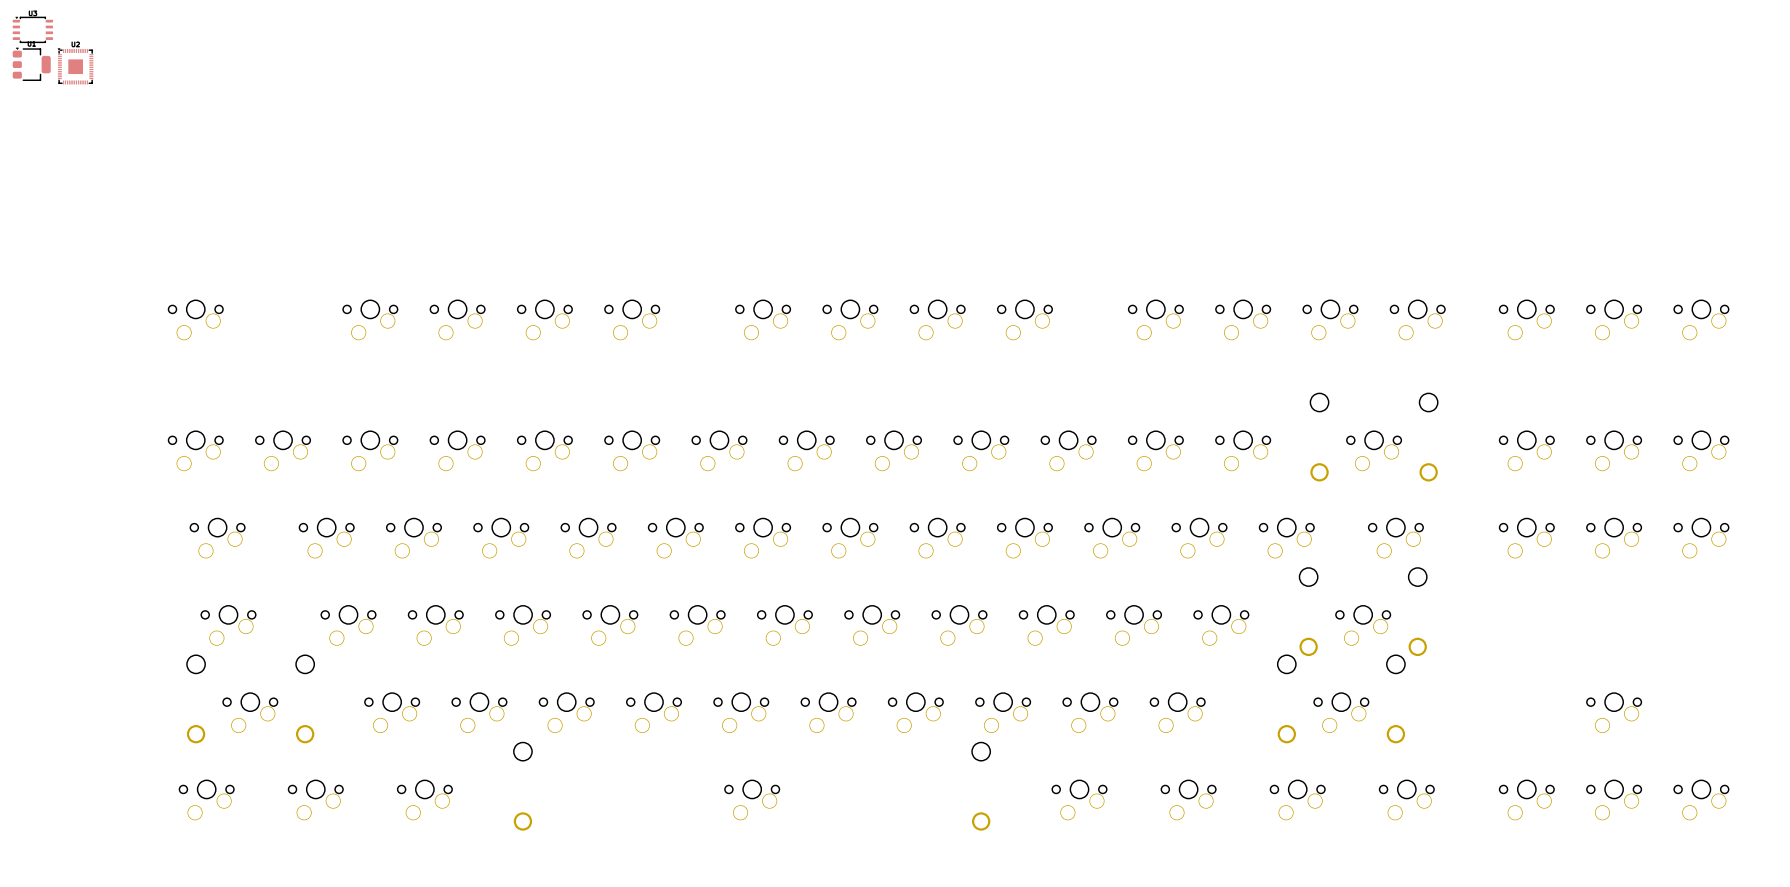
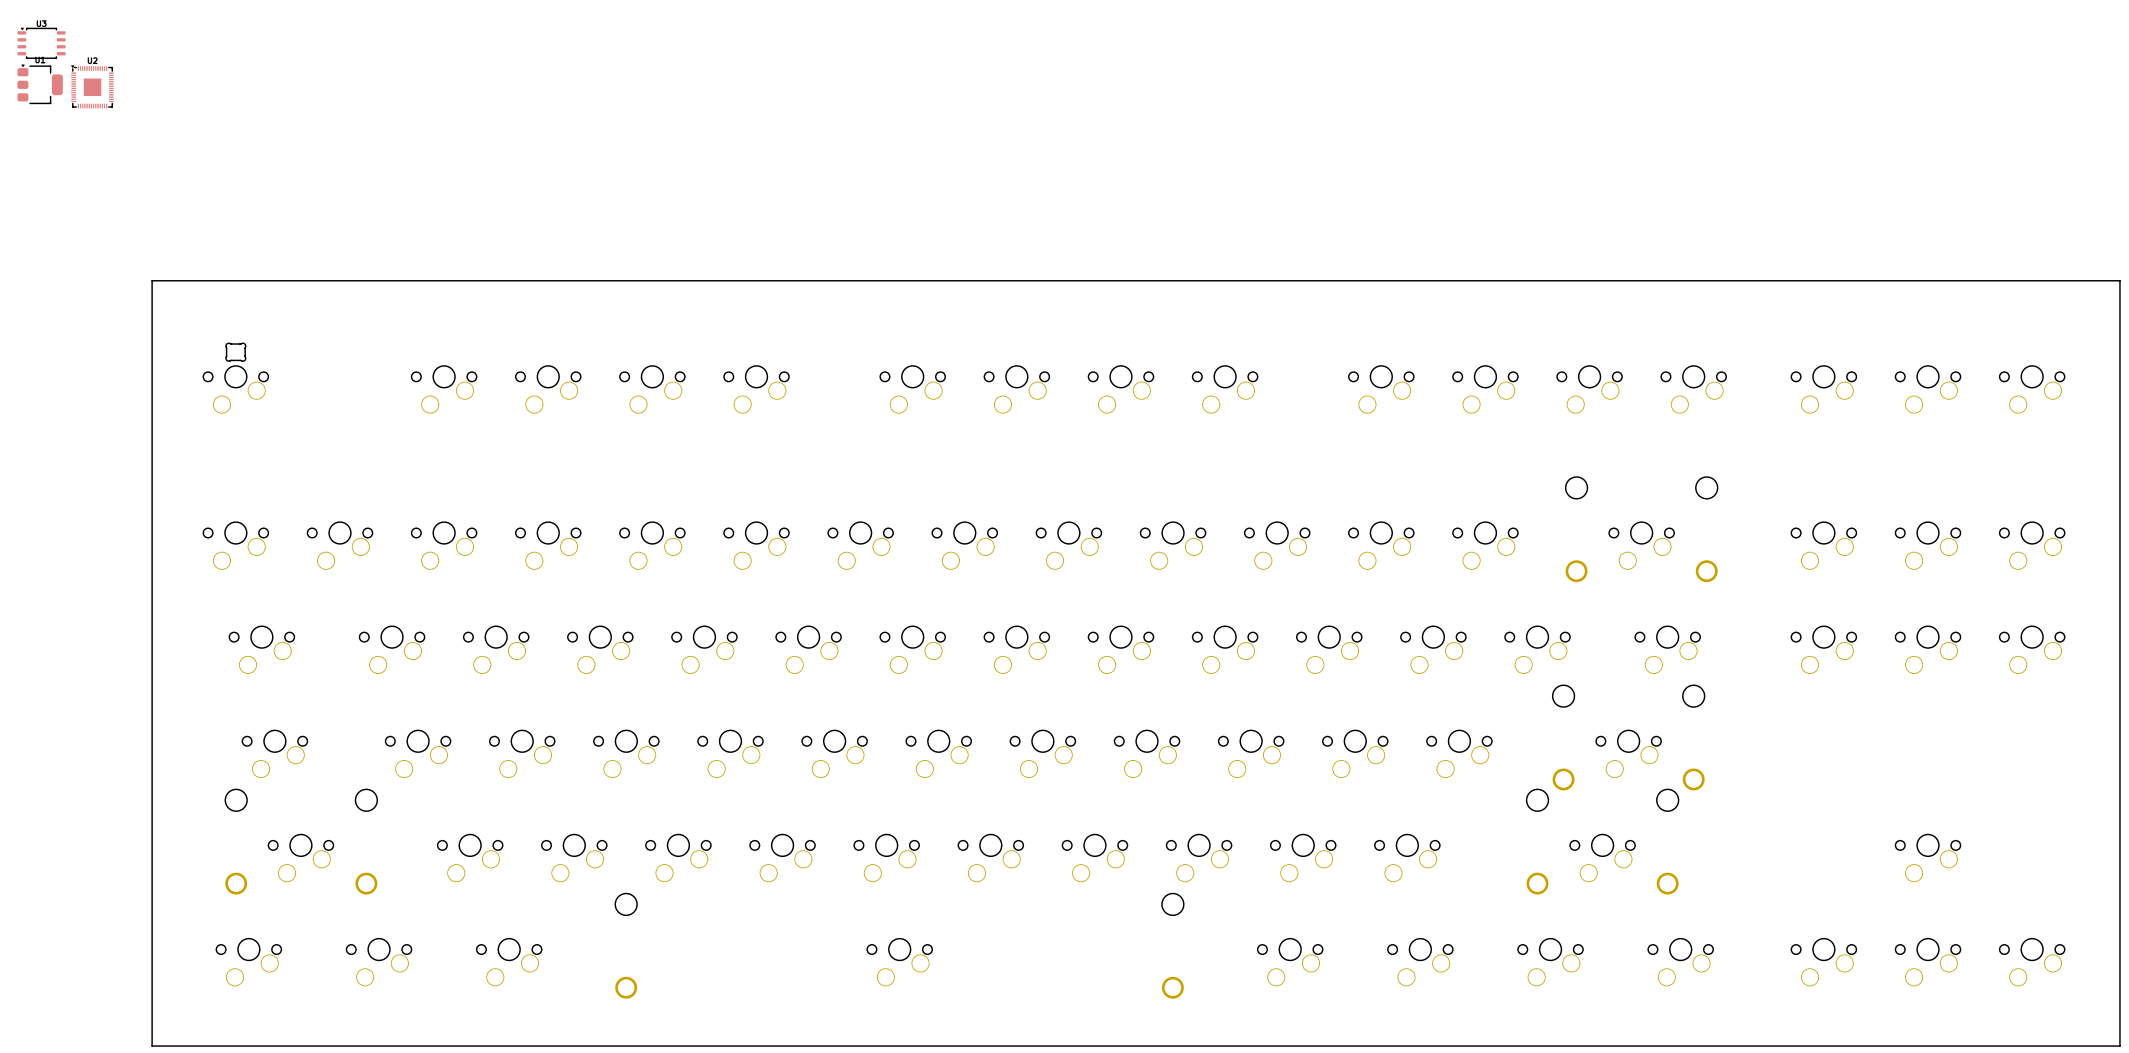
board edge: none -> (152, 280) (2119, 280) (2119, 1046) (152, 1046) (152, 280)
part: none -> (235, 352)

